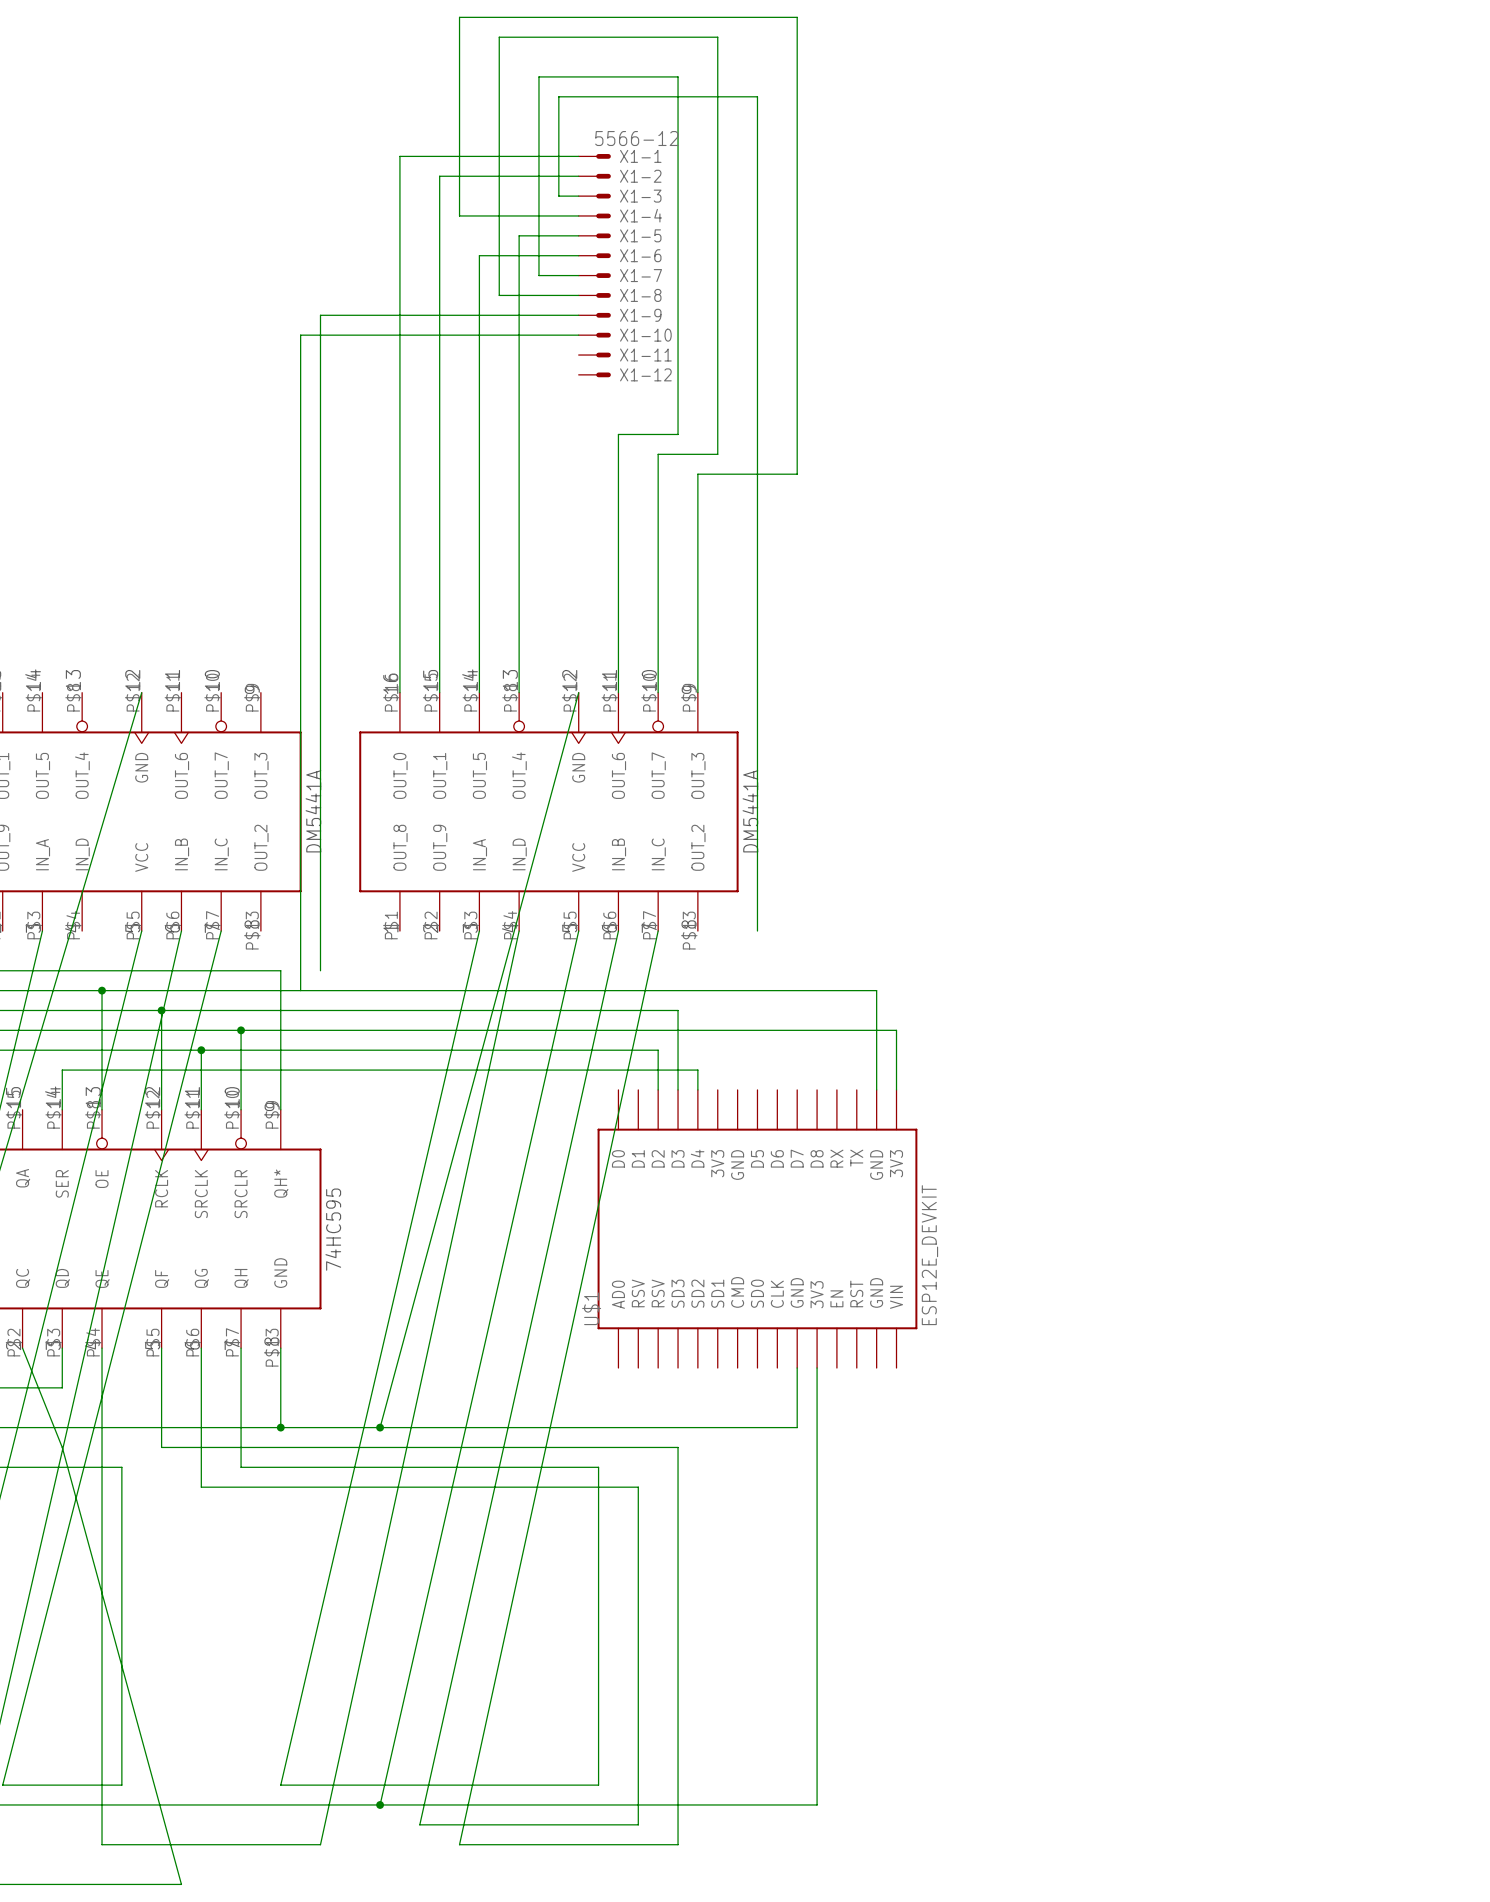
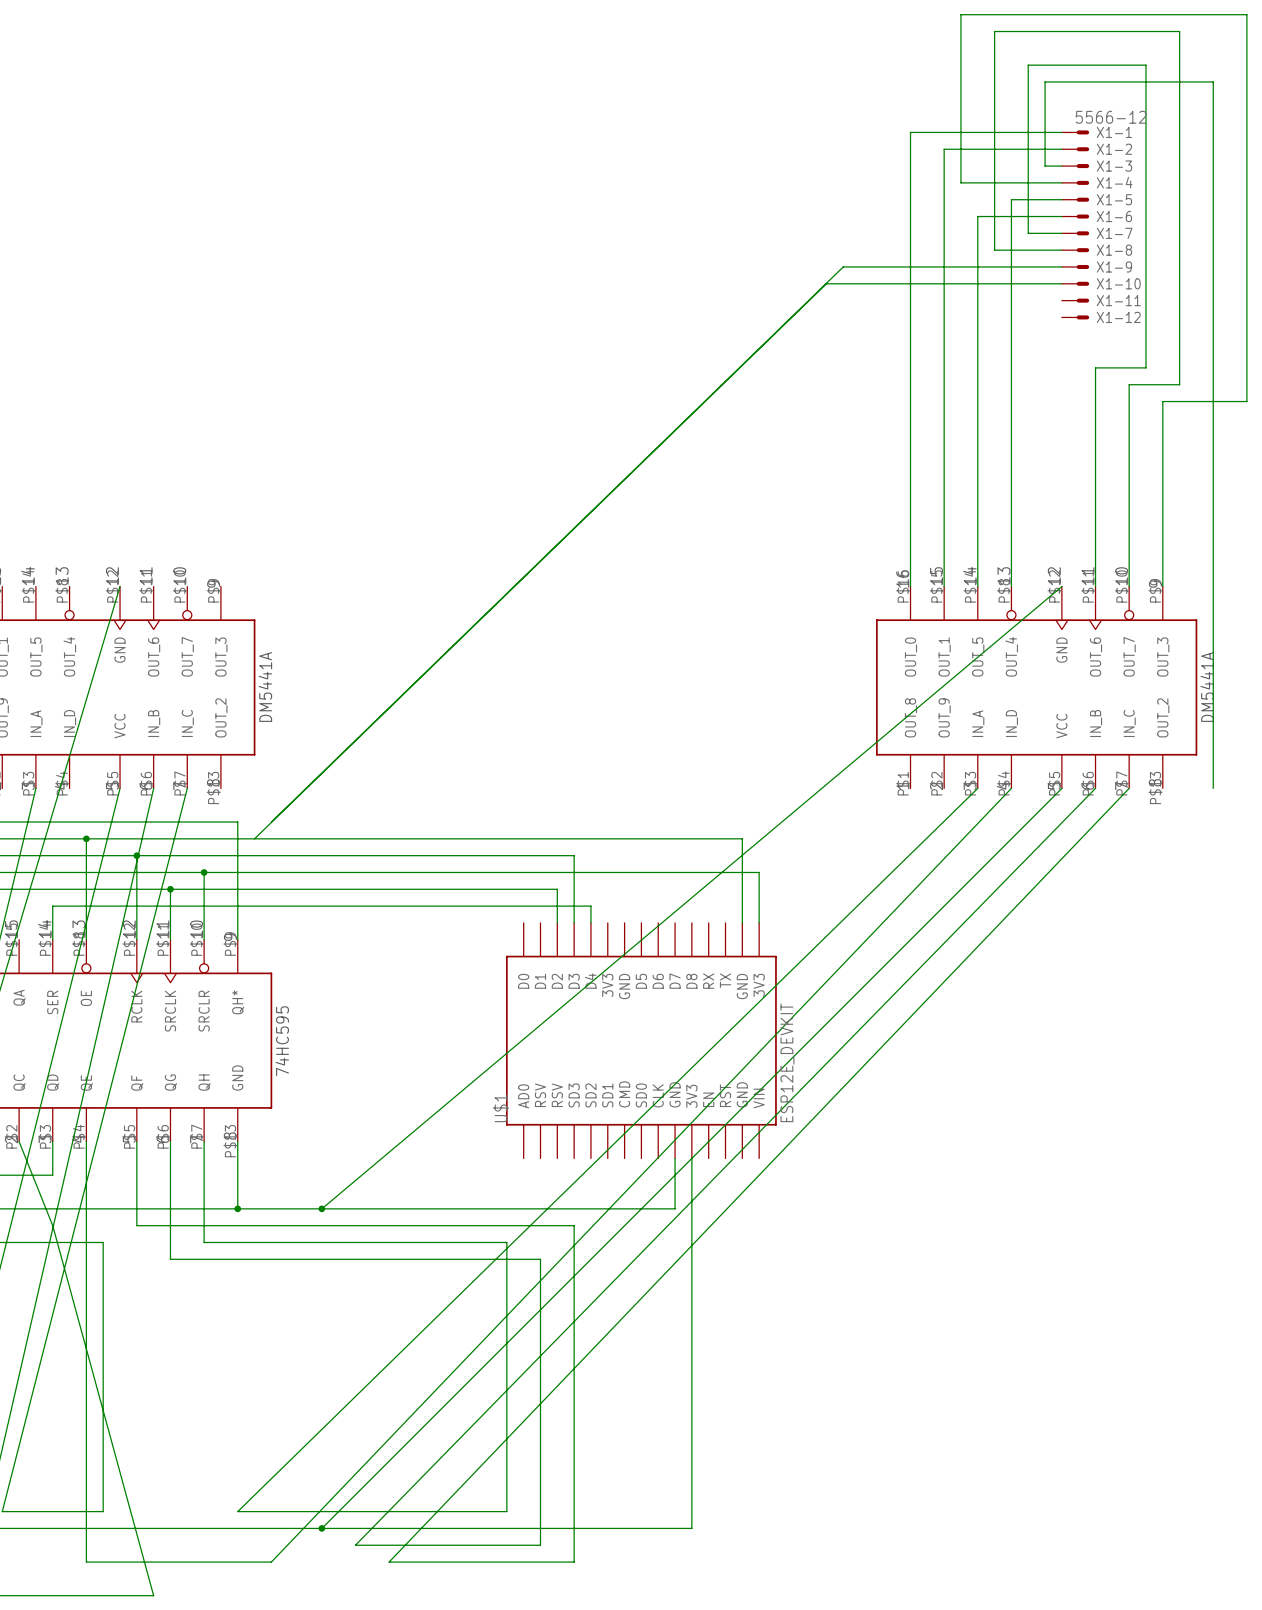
wire: (578, 156) (399, 156) (399, 692) -> none
X1-1 position: (594, 156) -> (1075, 132)
wire: none -> (1061, 132) (910, 132) (910, 586)
wire: (578, 176) (439, 176) (439, 692) -> none
X1-2 position: (594, 176) -> (1075, 149)
wire: none -> (1061, 149) (944, 149) (944, 586)
wire: (578, 196) (558, 196) (558, 96) (757, 96) (757, 931) -> none
X1-3 position: (594, 196) -> (1075, 166)
wire: none -> (1061, 166) (1045, 166) (1045, 81) (1213, 81) (1213, 788)
wire: (578, 215) (459, 215) (459, 17) (797, 17) (797, 474) (697, 474) (697, 692) -> none
X1-4 position: (594, 215) -> (1075, 182)
wire: none -> (1061, 182) (960, 182) (960, 14) (1246, 14) (1246, 401) (1162, 401) (1162, 586)
wire: (578, 235) (519, 235) (519, 692) -> none
X1-5 position: (594, 235) -> (1075, 199)
wire: none -> (1061, 199) (1011, 199) (1011, 586)
wire: (578, 255) (479, 255) (479, 692) -> none
X1-6 position: (594, 255) -> (1075, 216)
wire: none -> (1061, 216) (977, 216) (977, 586)
wire: (578, 275) (538, 275) (538, 76) (678, 76) (678, 434) (618, 434) (618, 692) -> none
X1-7 position: (594, 275) -> (1075, 233)
wire: none -> (1061, 233) (1028, 233) (1028, 65) (1145, 65) (1145, 367) (1095, 367) (1095, 586)
wire: (578, 295) (499, 295) (499, 37) (717, 37) (717, 454) (658, 454) (658, 692) -> none
X1-8 position: (594, 295) -> (1075, 250)
wire: none -> (1061, 250) (994, 250) (994, 31) (1179, 31) (1179, 384) (1129, 384) (1129, 586)
wire: (578, 315) (320, 315) (320, 970) -> (1061, 266) (843, 266) (271, 822)
X1-9 position: (594, 315) -> (1075, 266)
wire: (578, 335) (300, 335) (300, 990) -> (1061, 283) (826, 283) (254, 838)
X1-10 position: (594, 335) -> (1075, 283)
X1-11 position: (594, 355) -> (1075, 300)
X1-12 position: (594, 374) -> (1075, 317)
wire: (578, 692) (380, 1427) -> (1061, 586) (321, 1208)
part: (548, 811) -> none
part: none -> (1036, 687)
wire: (479, 931) (280, 1785) -> (977, 788) (237, 1511)
wire: (519, 931) (320, 1844) -> (1011, 788) (271, 1562)
wire: (578, 931) (380, 1804) -> (1061, 788) (321, 1528)
wire: (618, 931) (419, 1824) -> (1095, 788) (355, 1545)
wire: (658, 931) (459, 1844) -> (1129, 788) (389, 1562)

